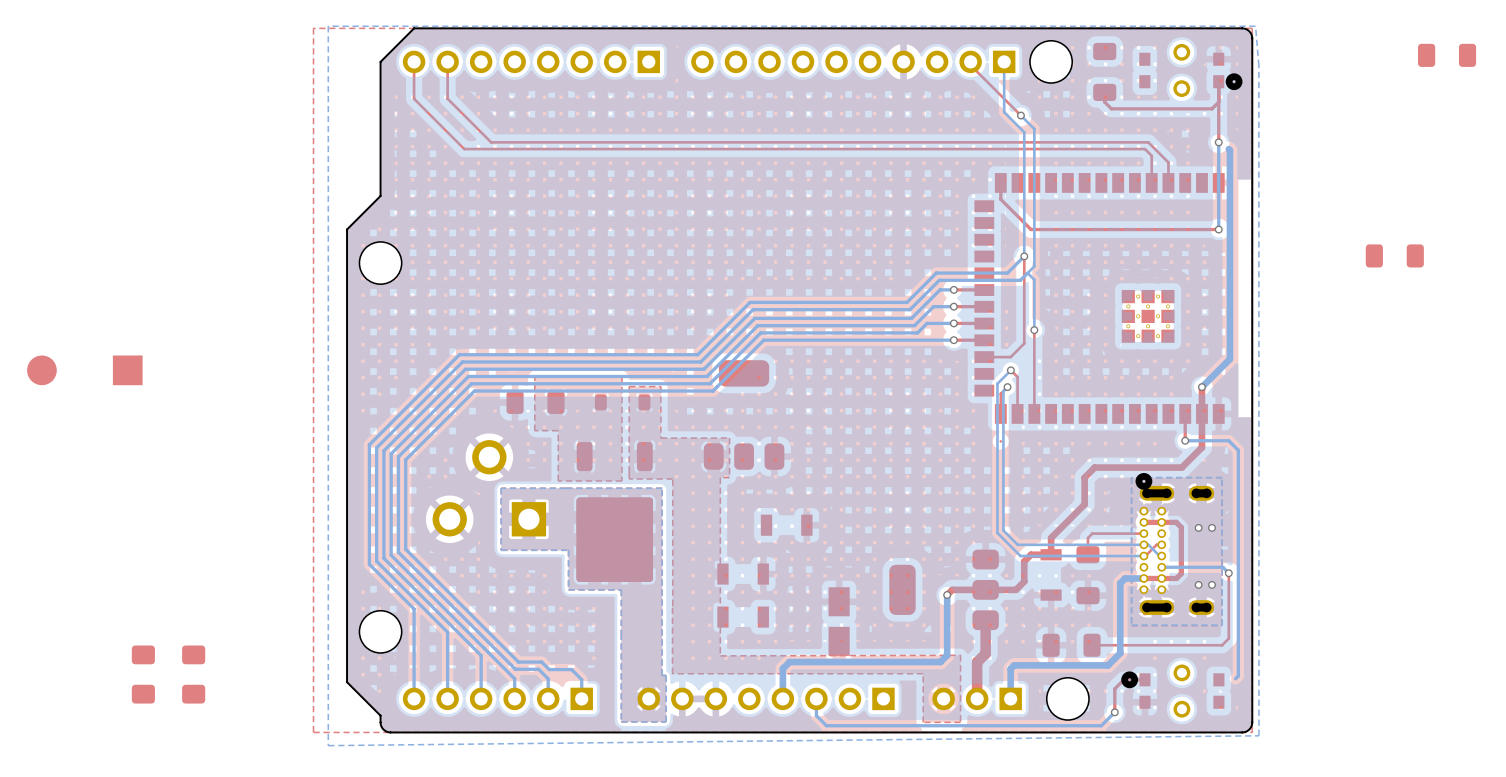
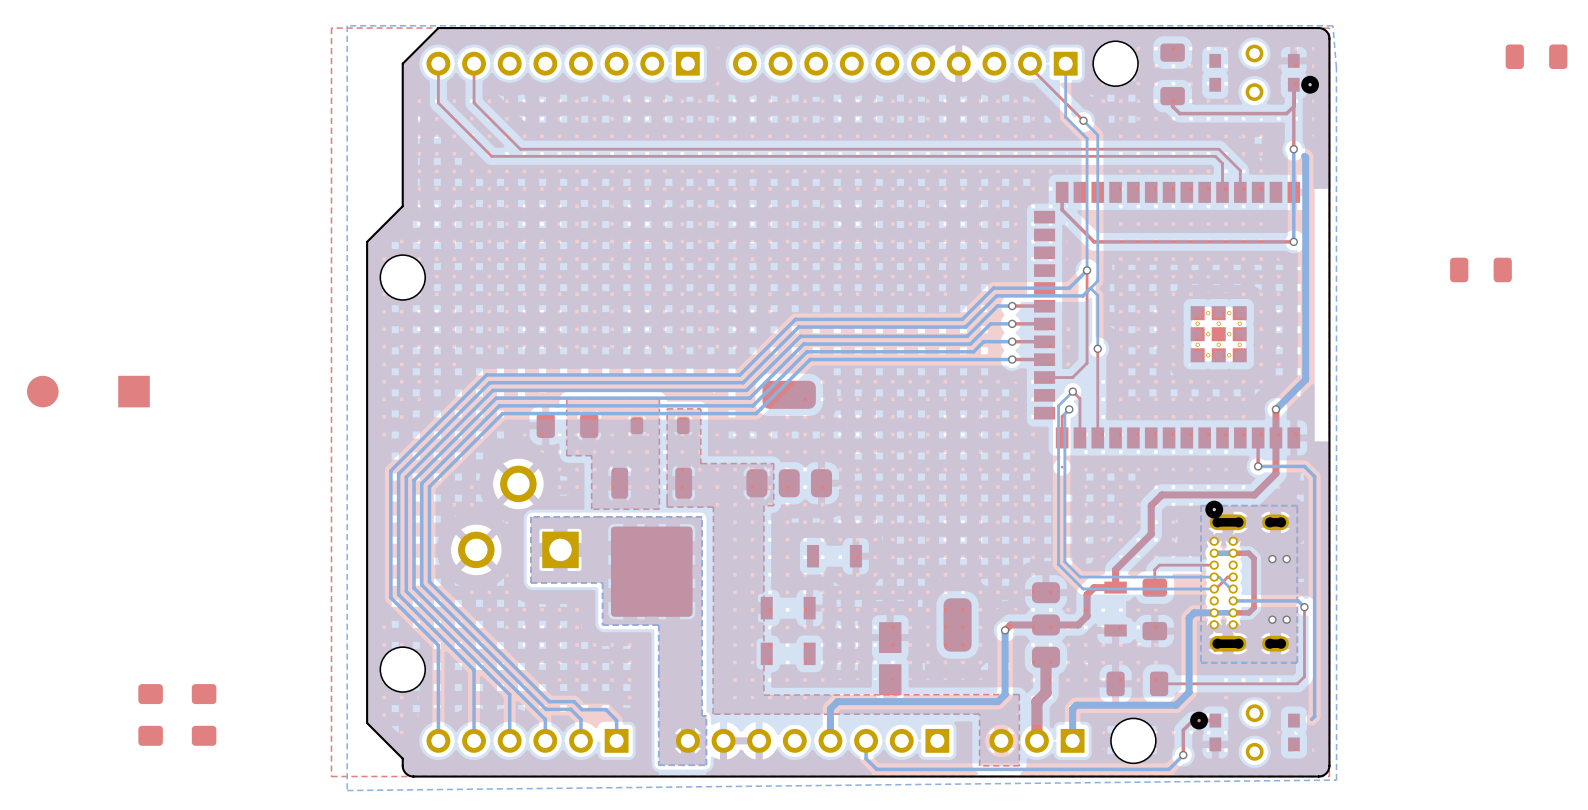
top track: (1161, 522) (1143, 522) -> none
bottom track: none -> (1233, 553) (1214, 553)
top track: (1161, 578) (1143, 578) -> none
bottom track: none -> (1233, 612) (1214, 612)

